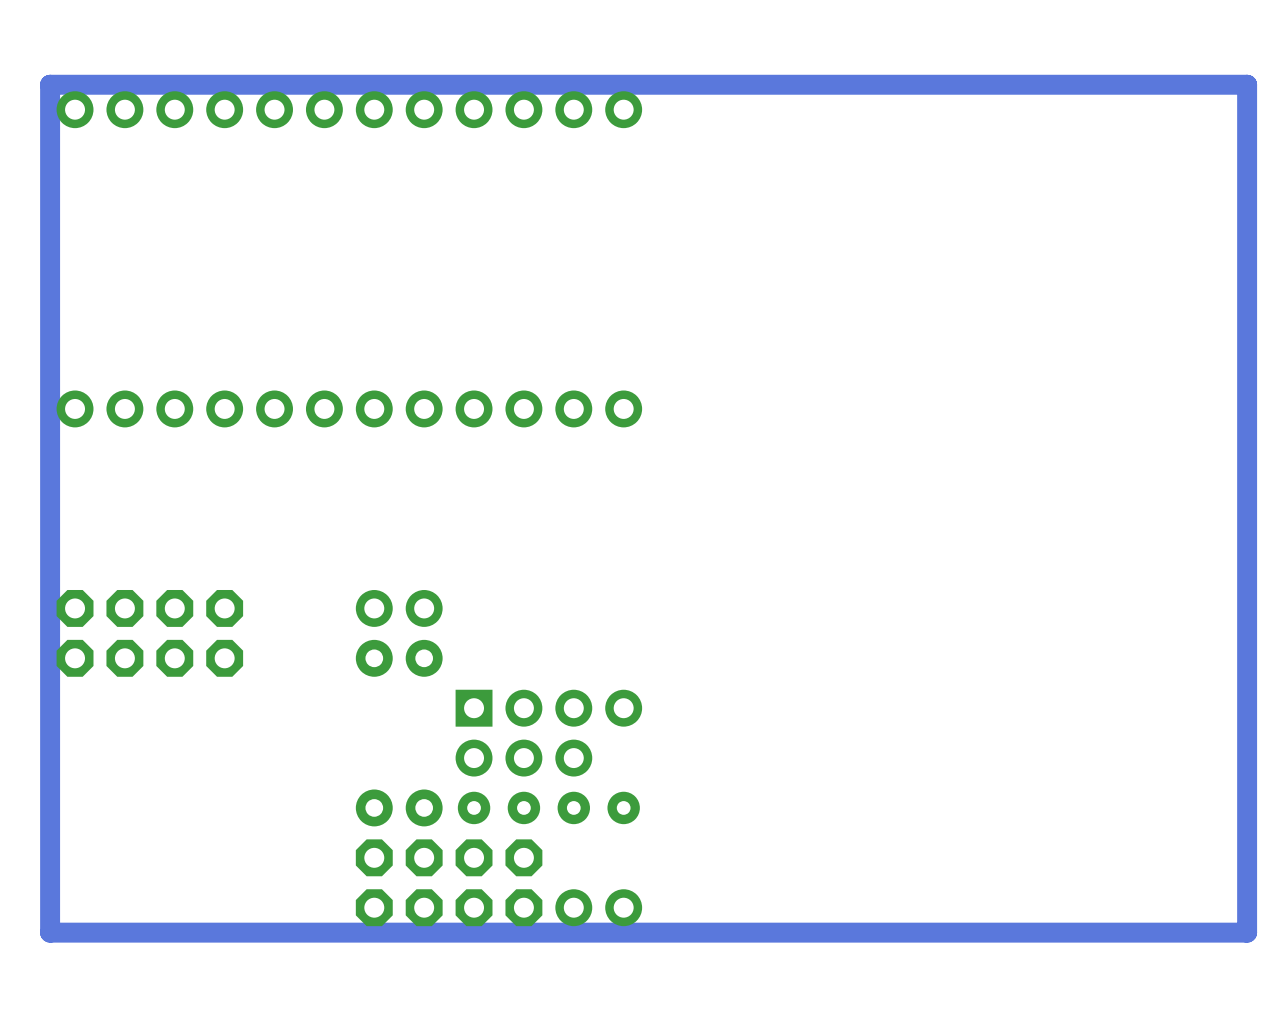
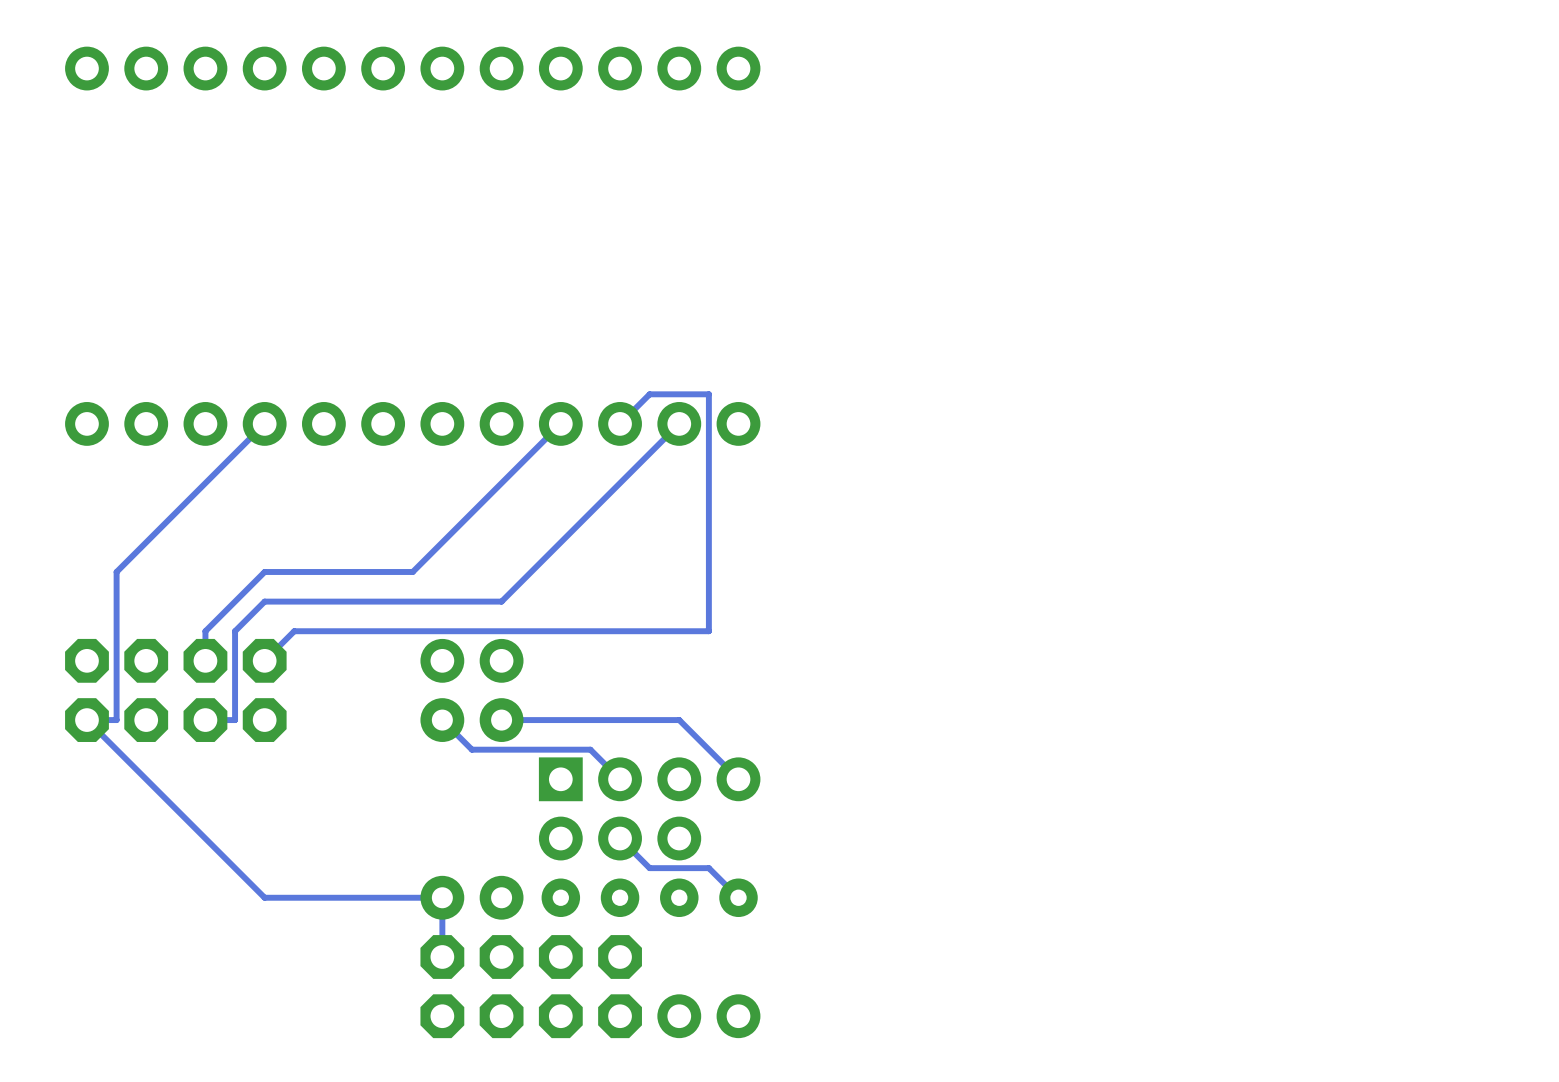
track: (1247, 84) (50, 84) (50, 932) (1247, 932) (1247, 84) -> none
track: none -> (264, 423) (116, 571) (116, 720) (86, 720) (264, 897) (442, 897) (442, 956)
track: none -> (560, 423) (412, 571) (264, 571) (205, 631) (205, 660)
track: none -> (620, 423) (649, 394) (708, 394) (708, 631) (294, 631) (264, 660)
track: none -> (679, 423) (501, 601) (264, 601) (235, 631) (235, 720) (205, 720)
track: none -> (442, 720) (471, 749) (590, 749) (620, 779)
track: none -> (501, 720) (679, 720) (738, 779)
track: none -> (620, 838) (649, 868) (708, 868) (738, 897)

